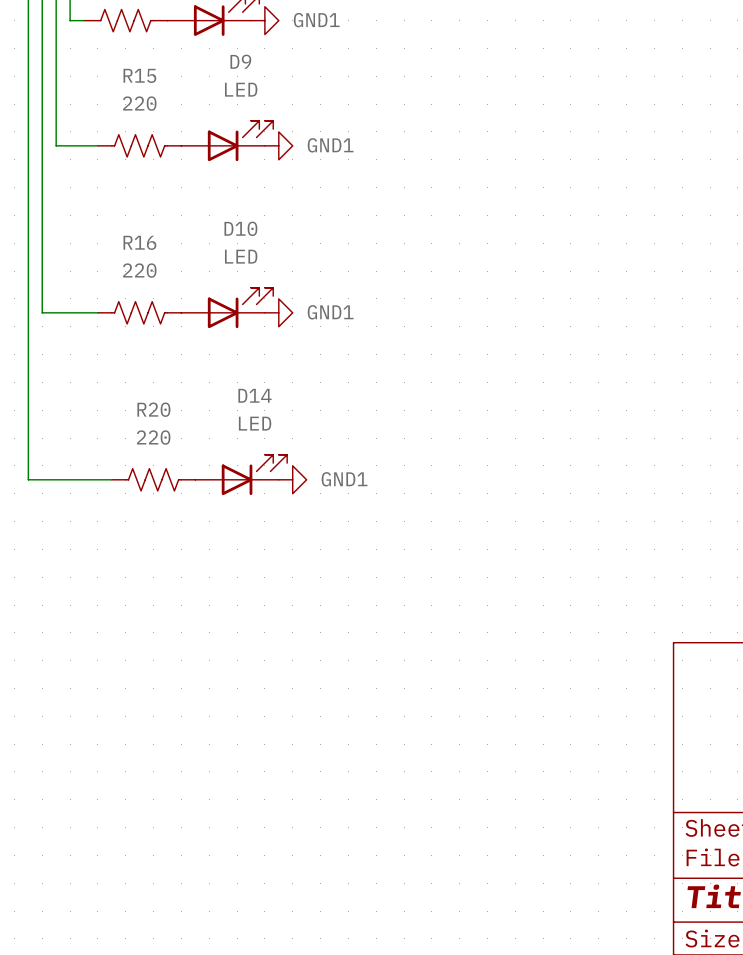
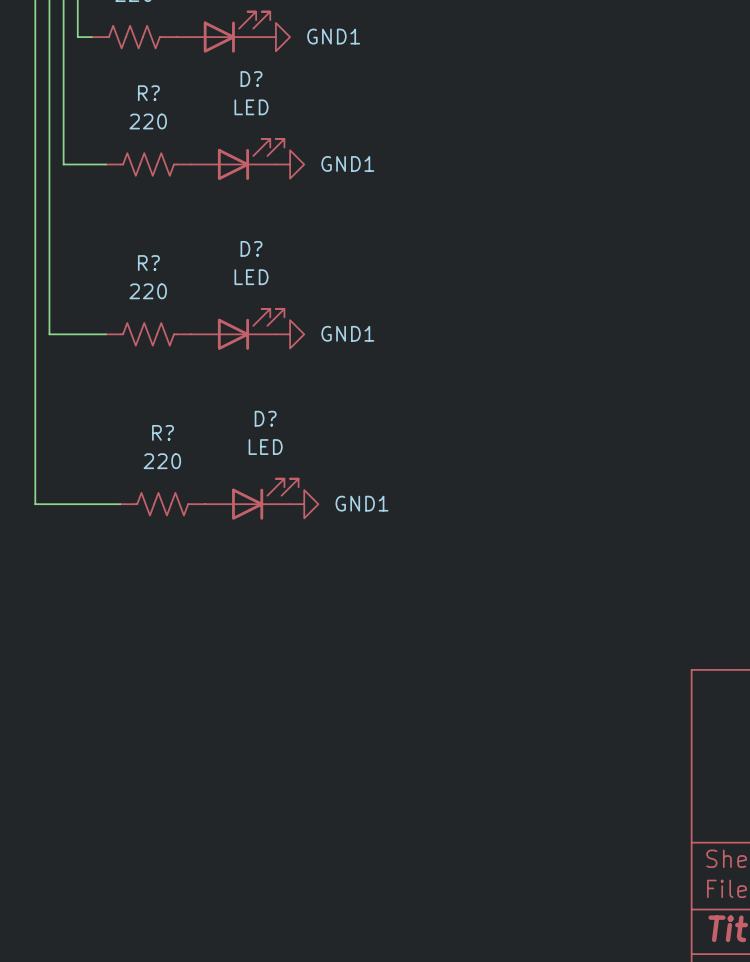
D9 name: D9 (240, 61) -> D? (251, 79)
R15 name: R15 (139, 75) -> R? (148, 93)
D10 name: D10 (240, 228) -> D? (251, 248)
R16 name: R16 (139, 242) -> R? (148, 263)
D14 name: D14 (255, 395) -> D? (265, 418)
R20 name: R20 (153, 409) -> R? (163, 432)

